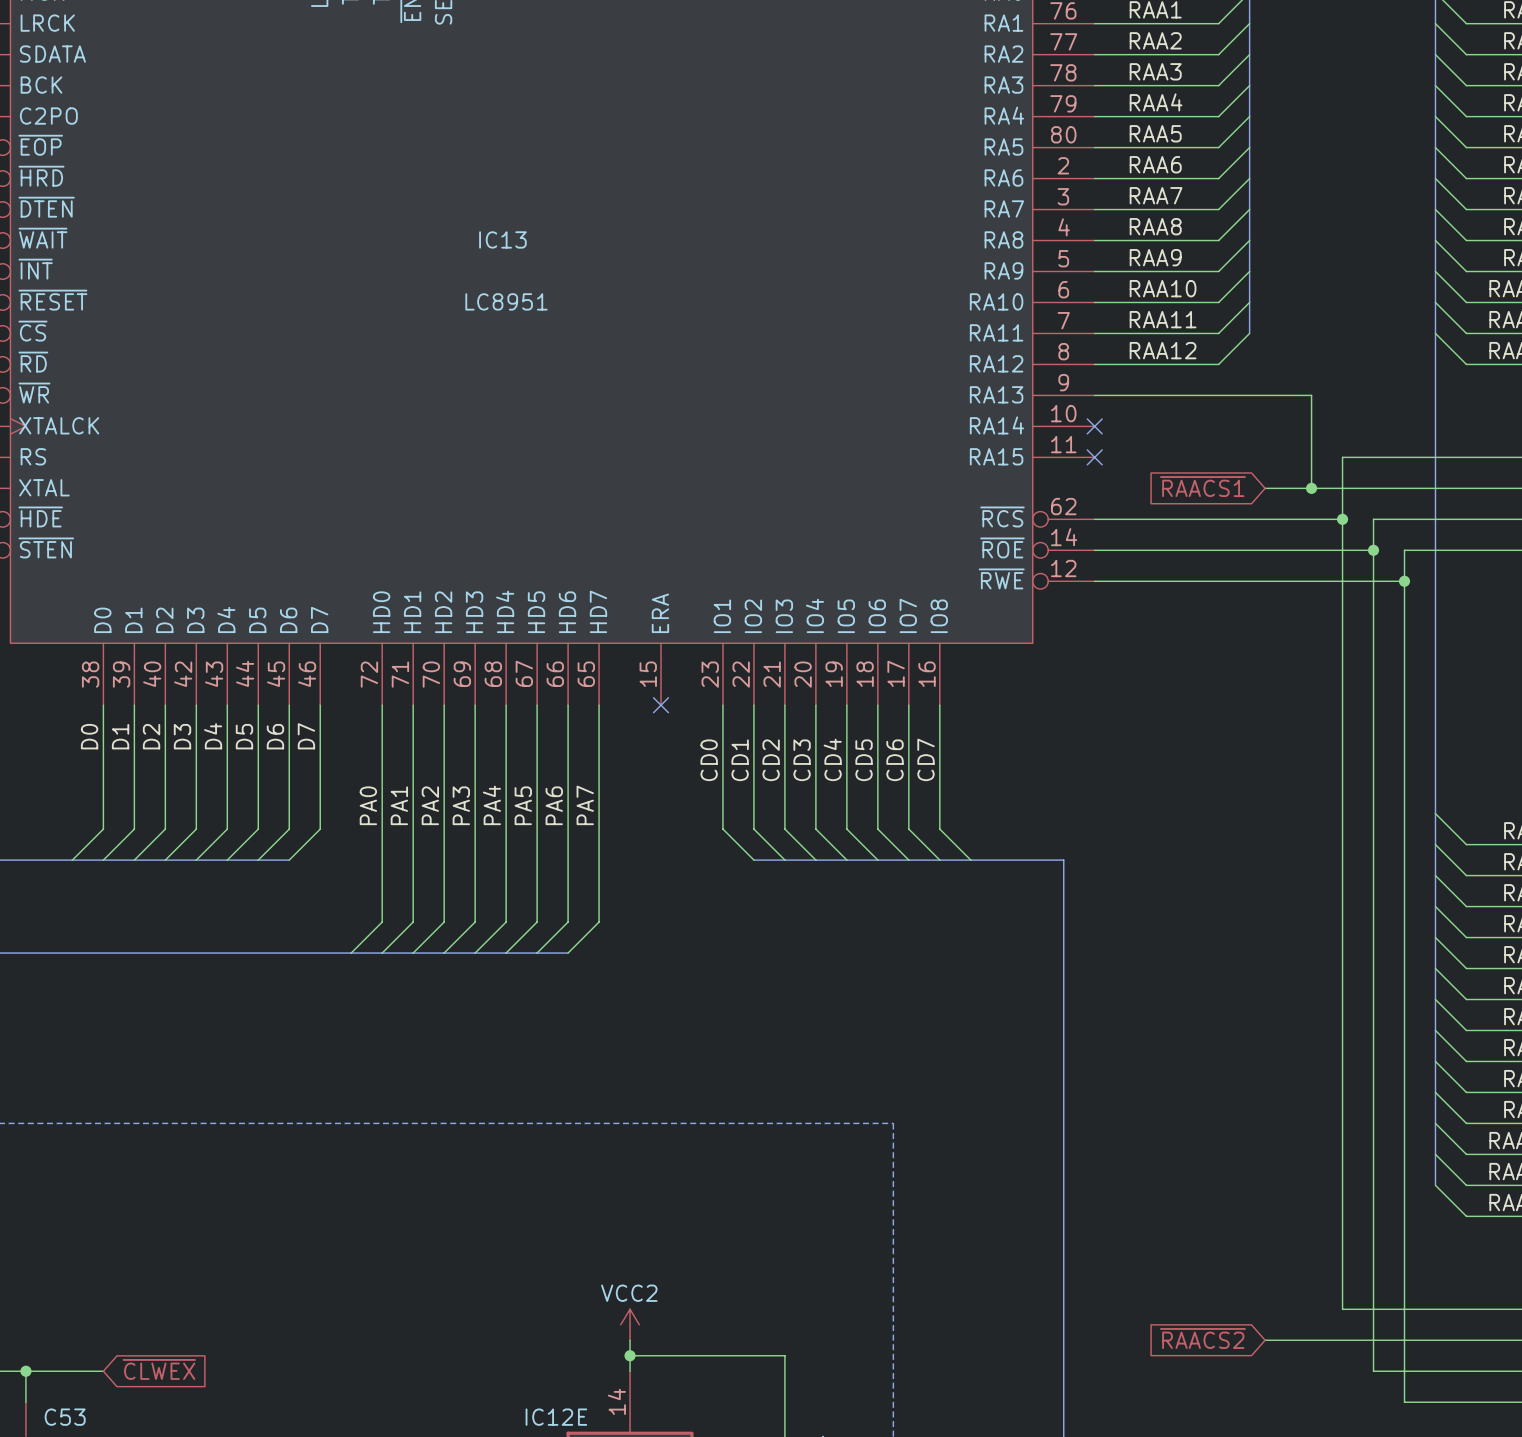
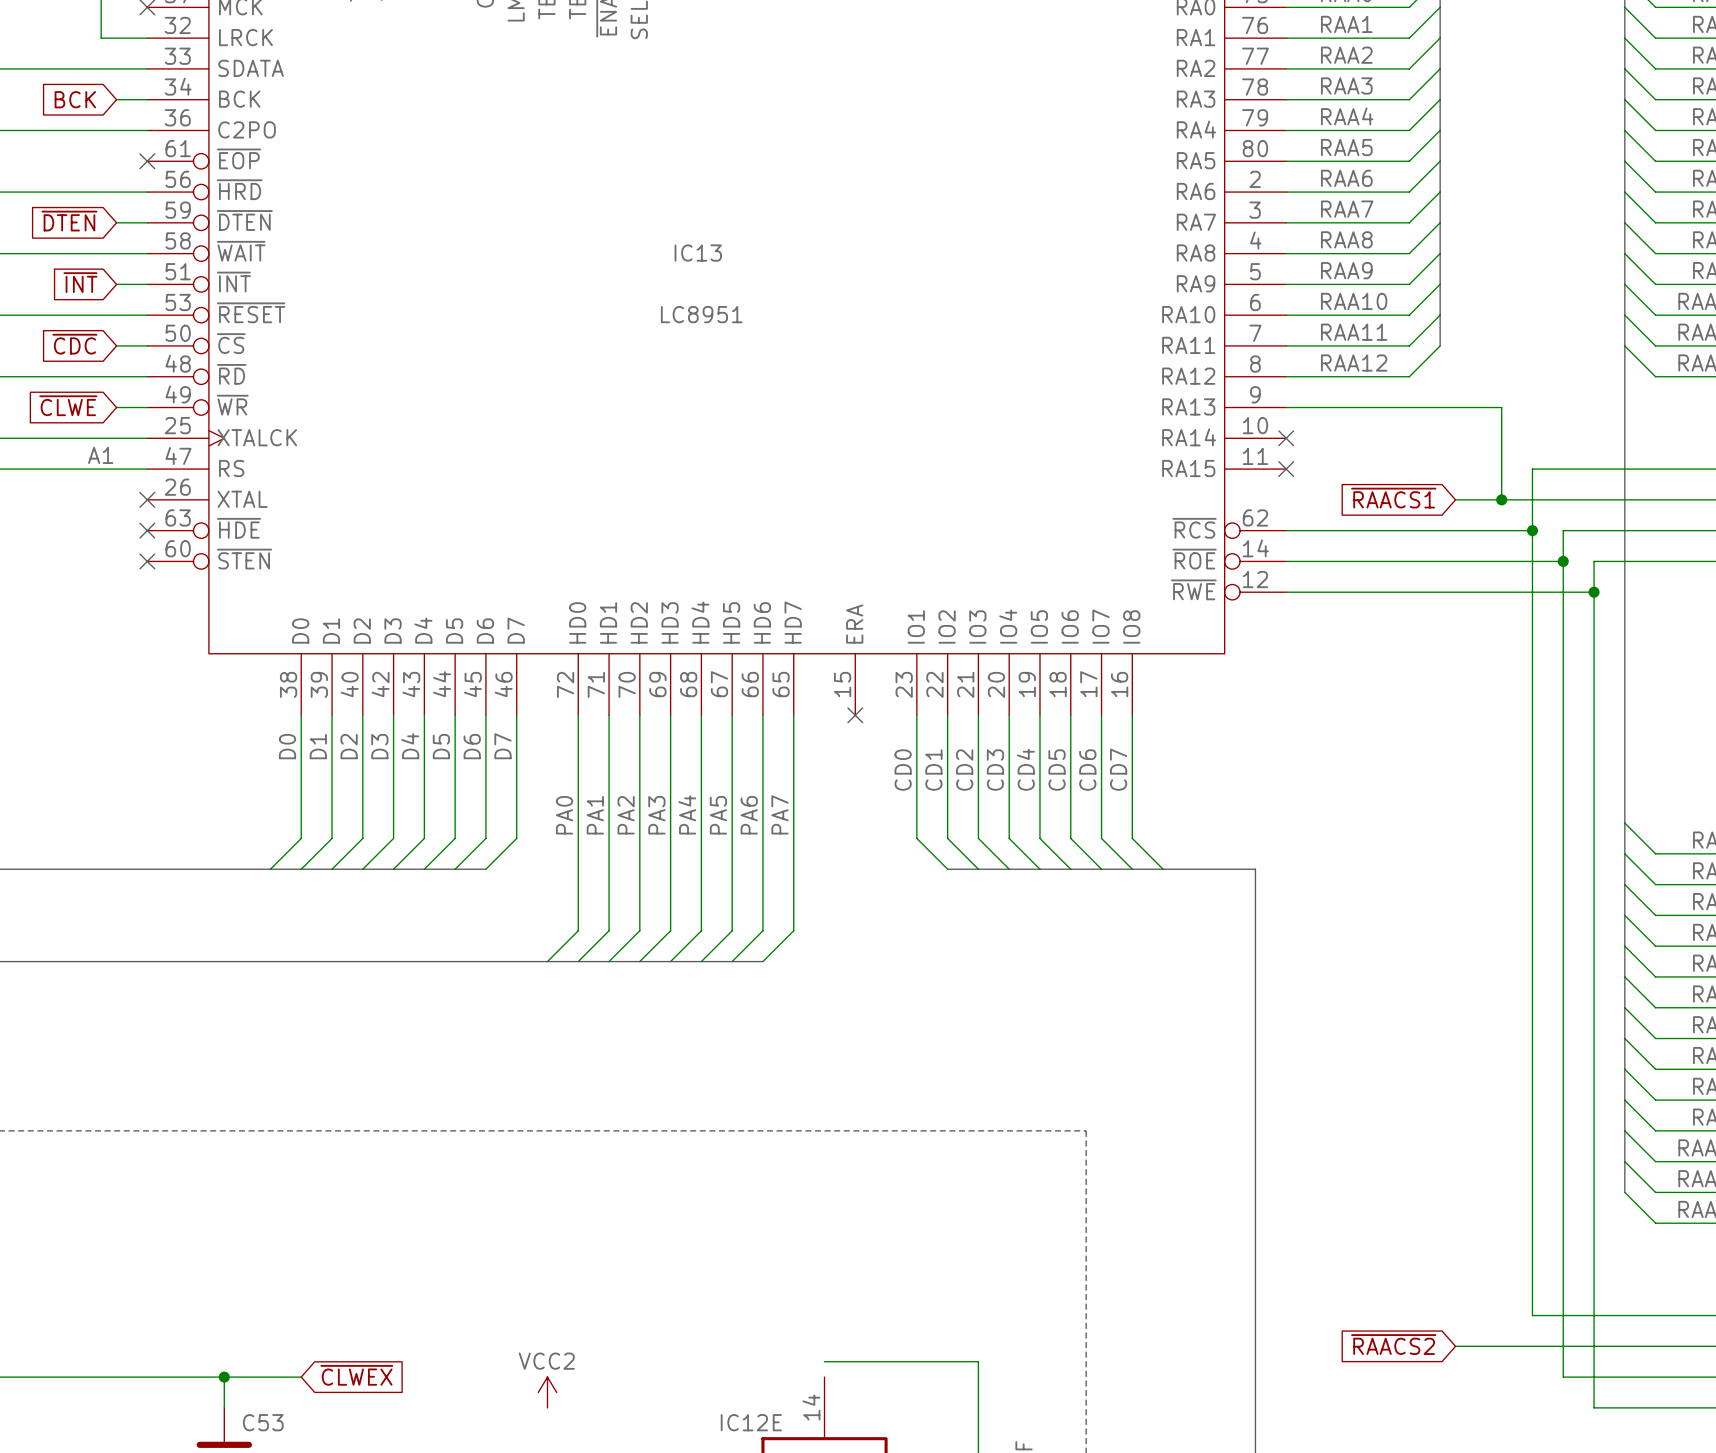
power symbol: VCC2 (630, 1324) -> none
wire: (630, 1340) (630, 1371) -> none
junction: (630, 1355) -> none
power symbol: none -> VCC2 (547, 1392)

